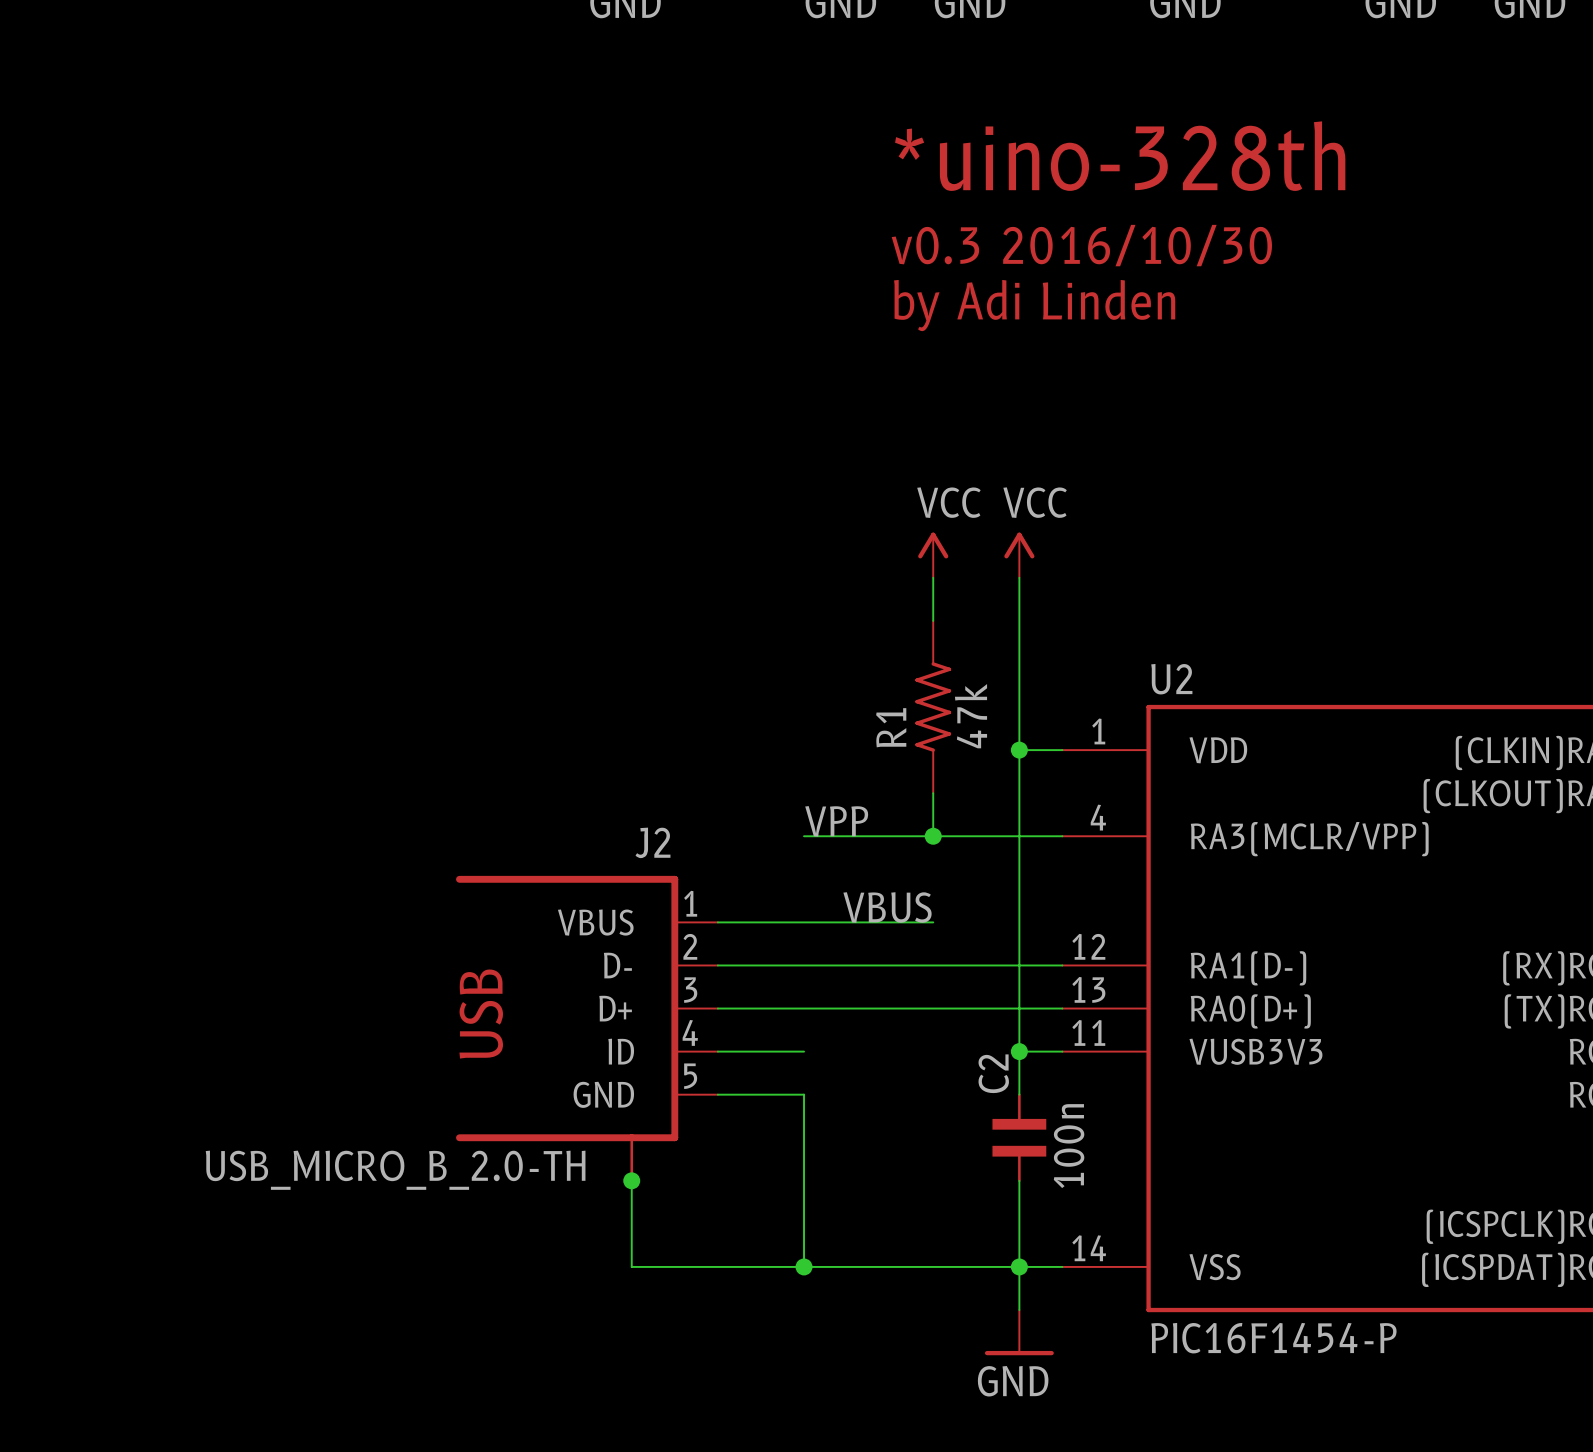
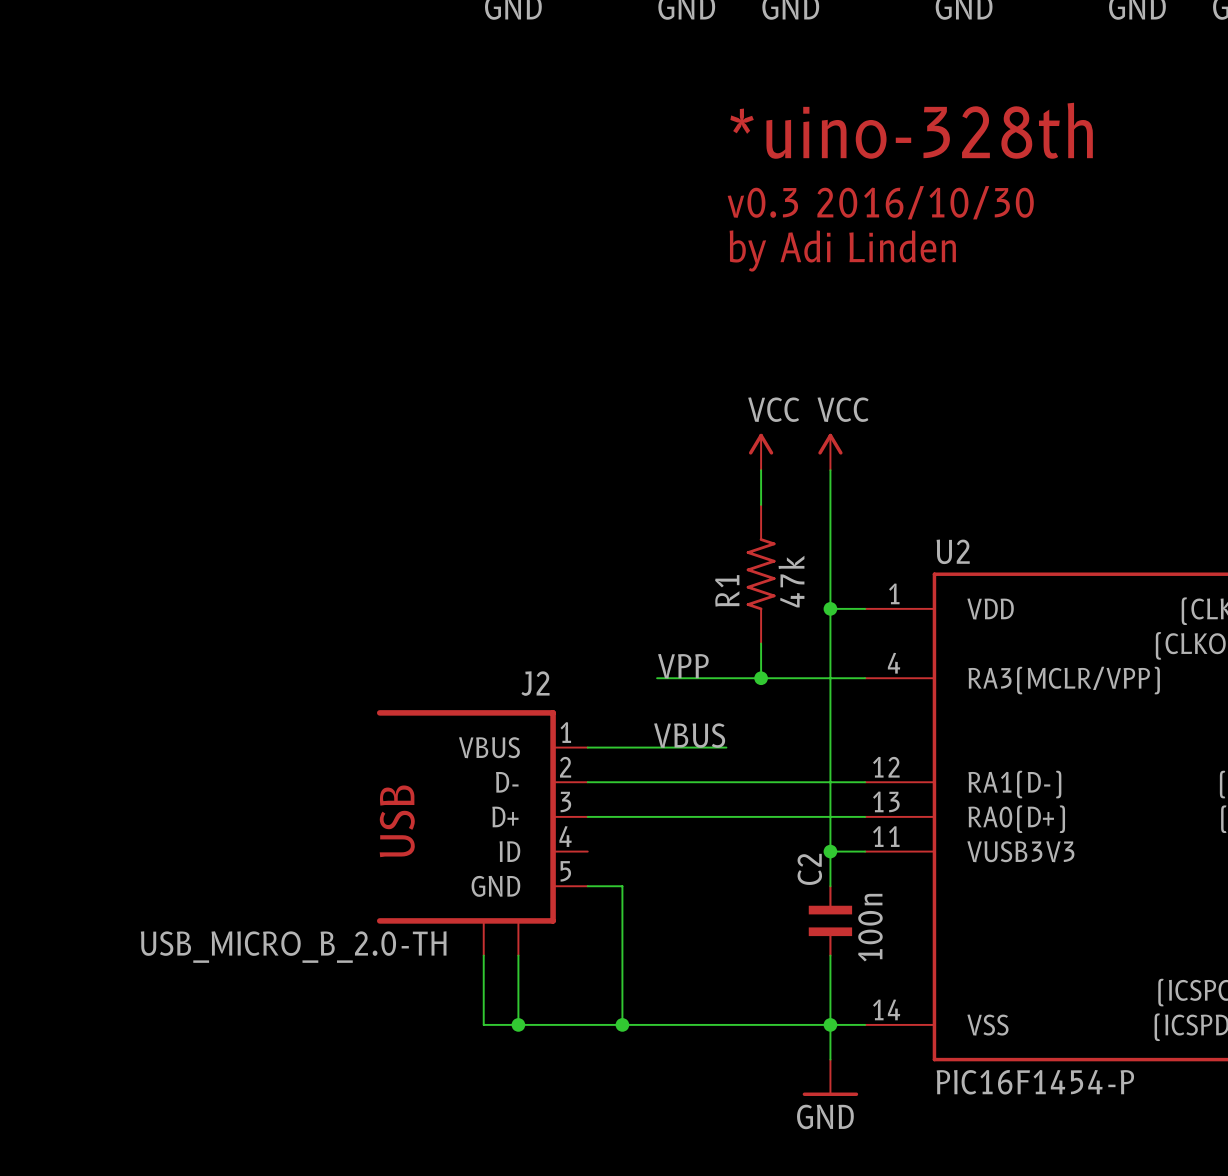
J2 symbol: [456, 875, 718, 1183] -> [376, 710, 588, 956]
label position: VBUS (887, 907) -> VBUS (689, 735)
wire: (890, 922) (933, 922) -> none
wire: (717, 1051) (804, 1051) -> none
wire: (760, 1094) (804, 1094) (804, 1266) -> (622, 886) (622, 1024)
J2 value position: USB_MICRO_B_2.0-TH (395, 1170) -> USB_MICRO_B_2.0-TH (293, 947)
wire: none -> (483, 955) (483, 1024) (518, 1024)
junction: (631, 1180) -> none
junction: none -> (518, 1024)
junction position: (804, 1266) -> (622, 1024)

